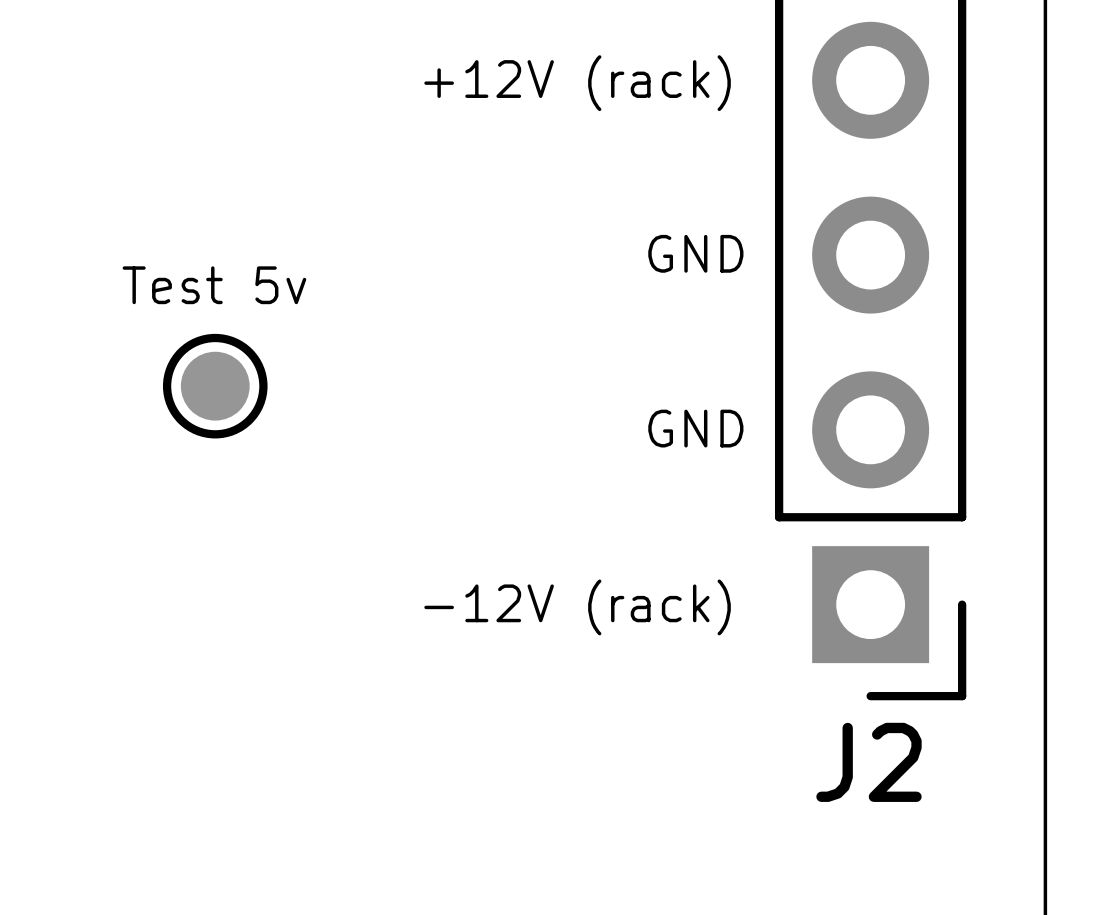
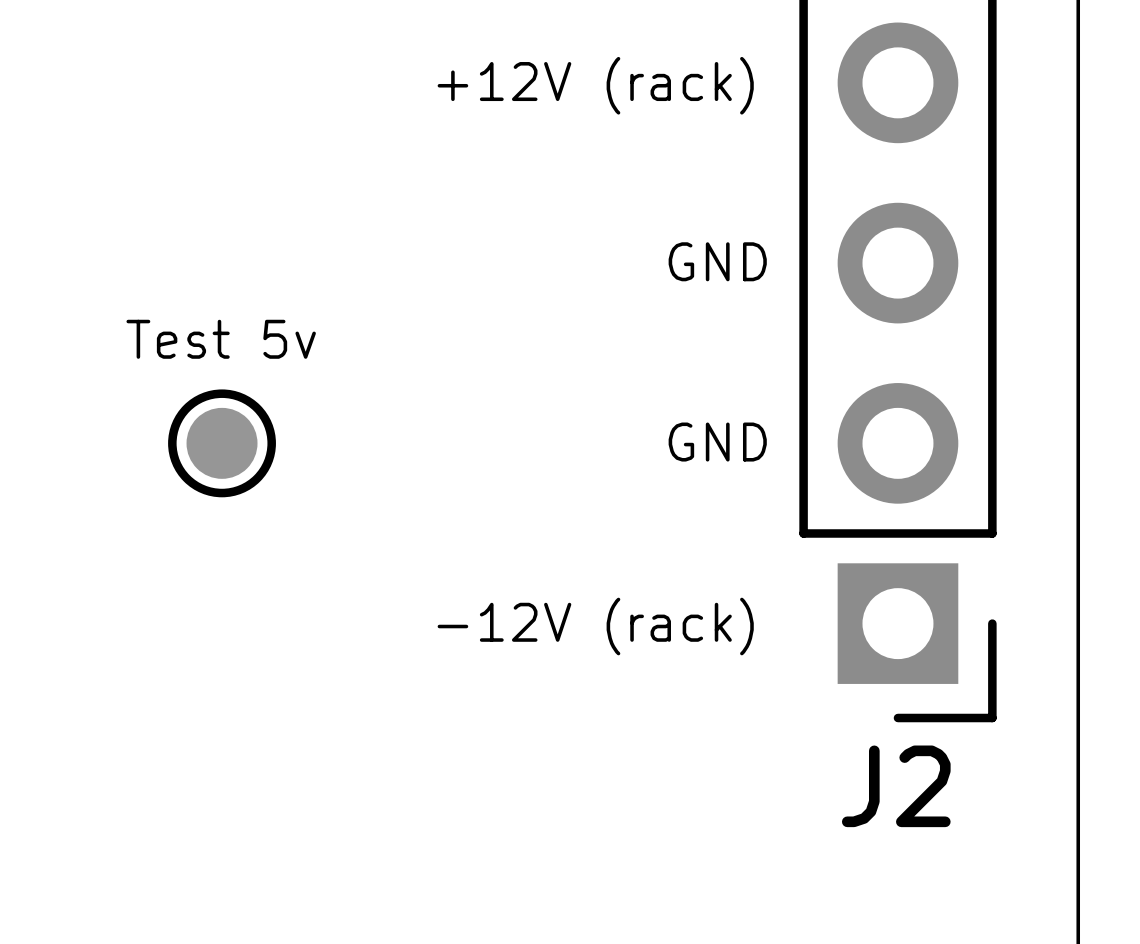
Test 5v position: (215, 386) -> (222, 443)

